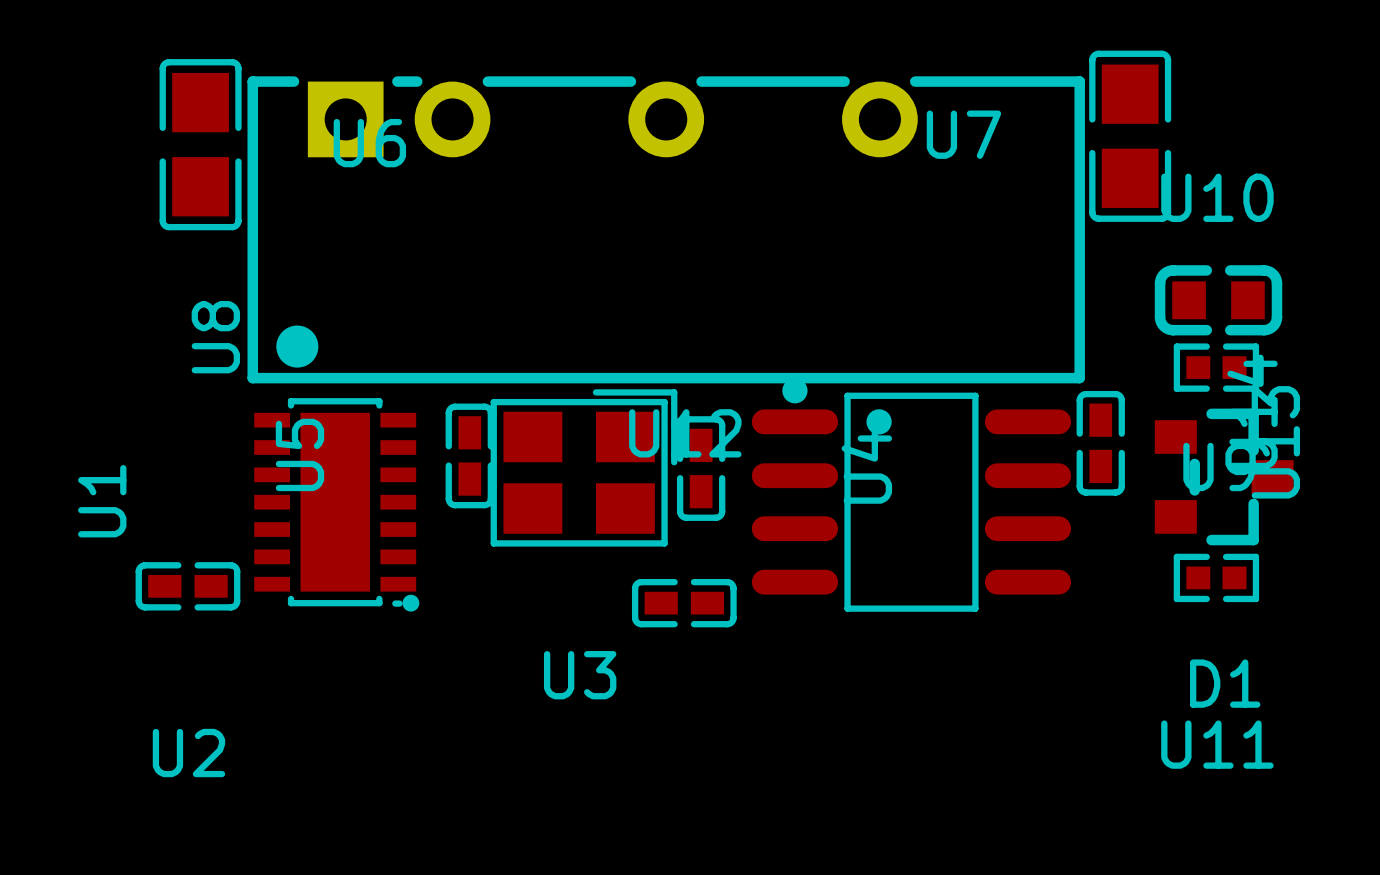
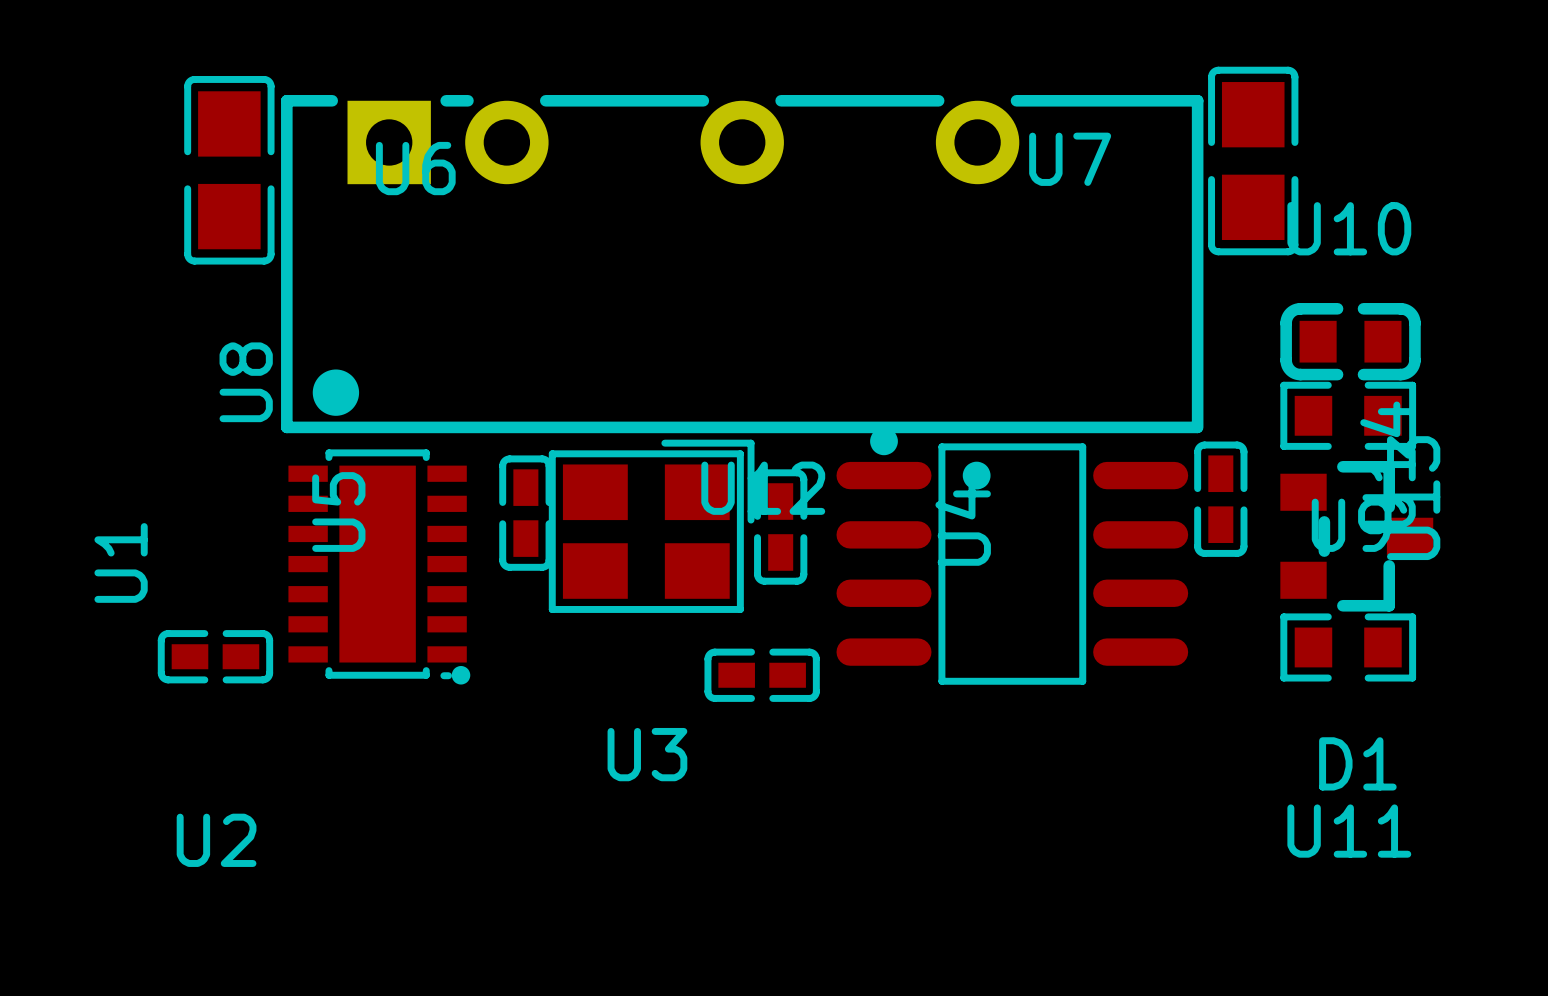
U10 footprint: [1173, 343, 1260, 392] -> [1280, 381, 1417, 450]
U11 footprint: [1173, 553, 1260, 603] -> [1280, 613, 1417, 682]

